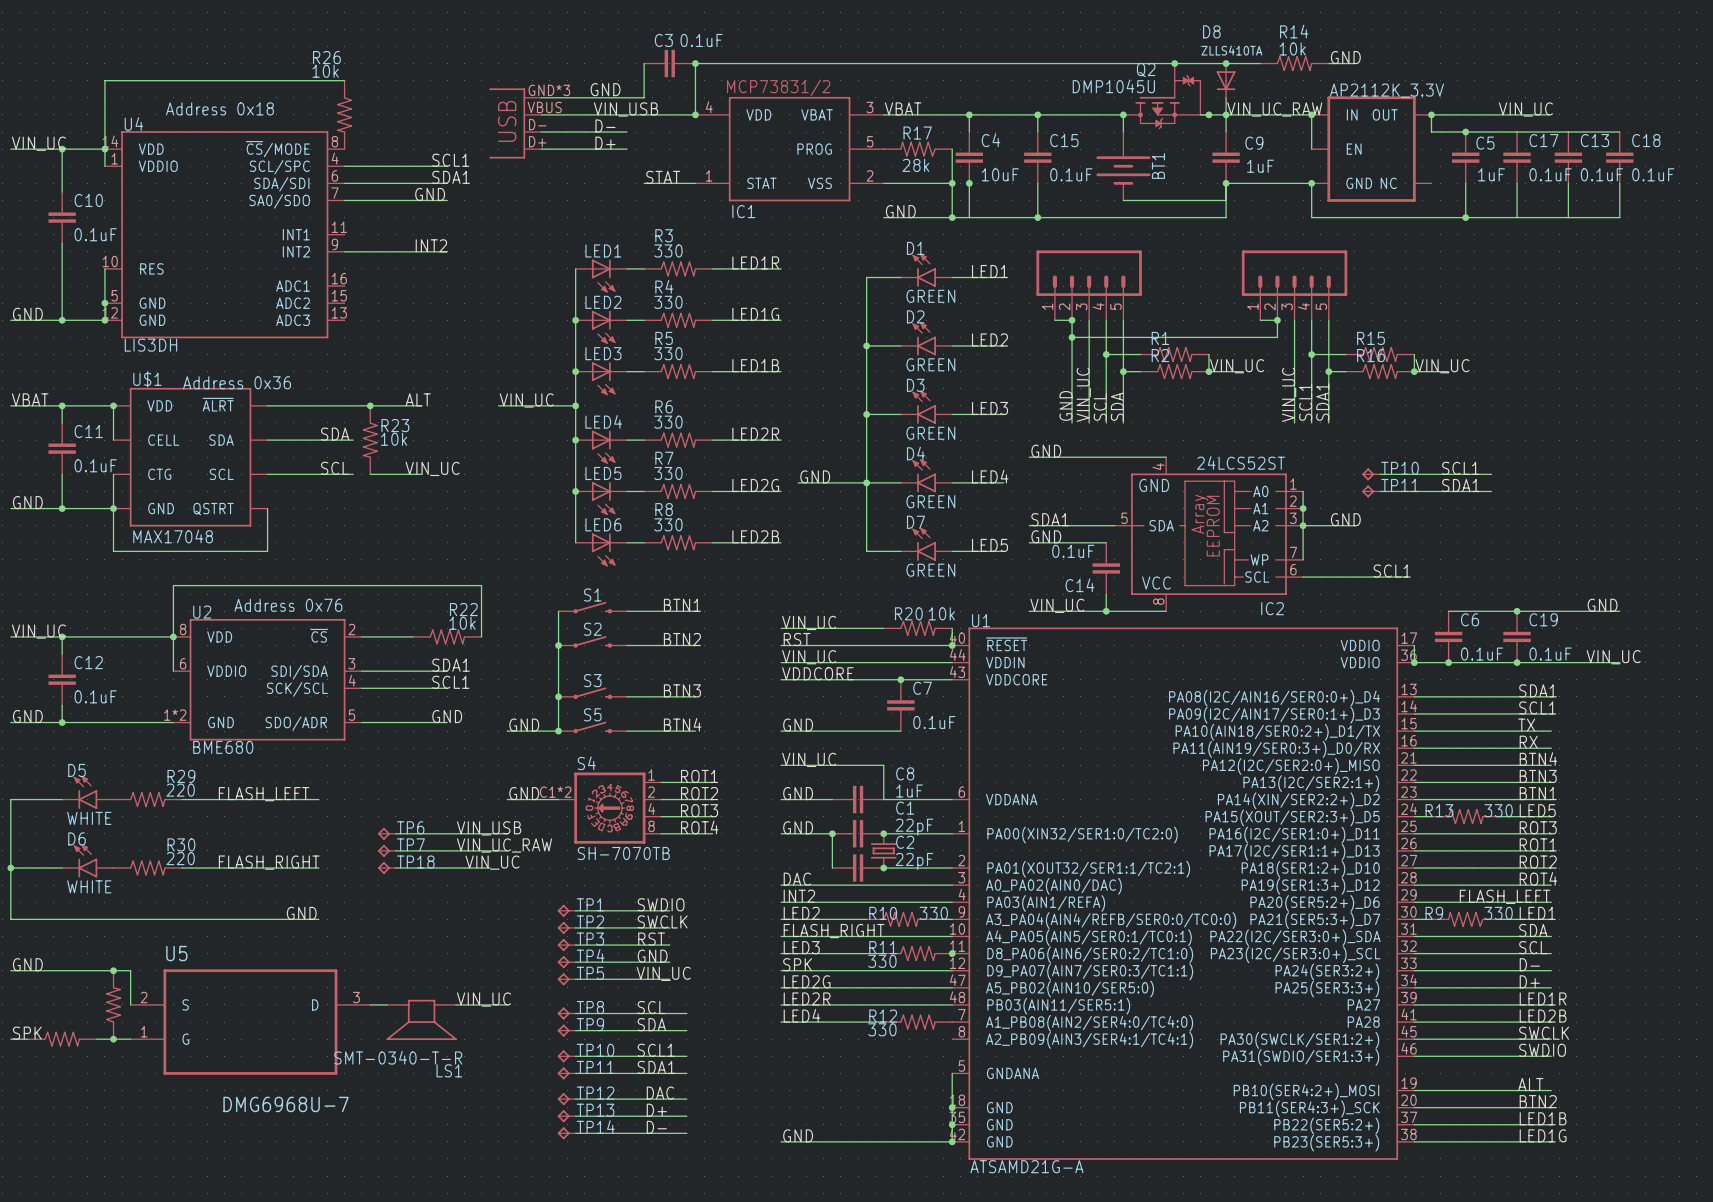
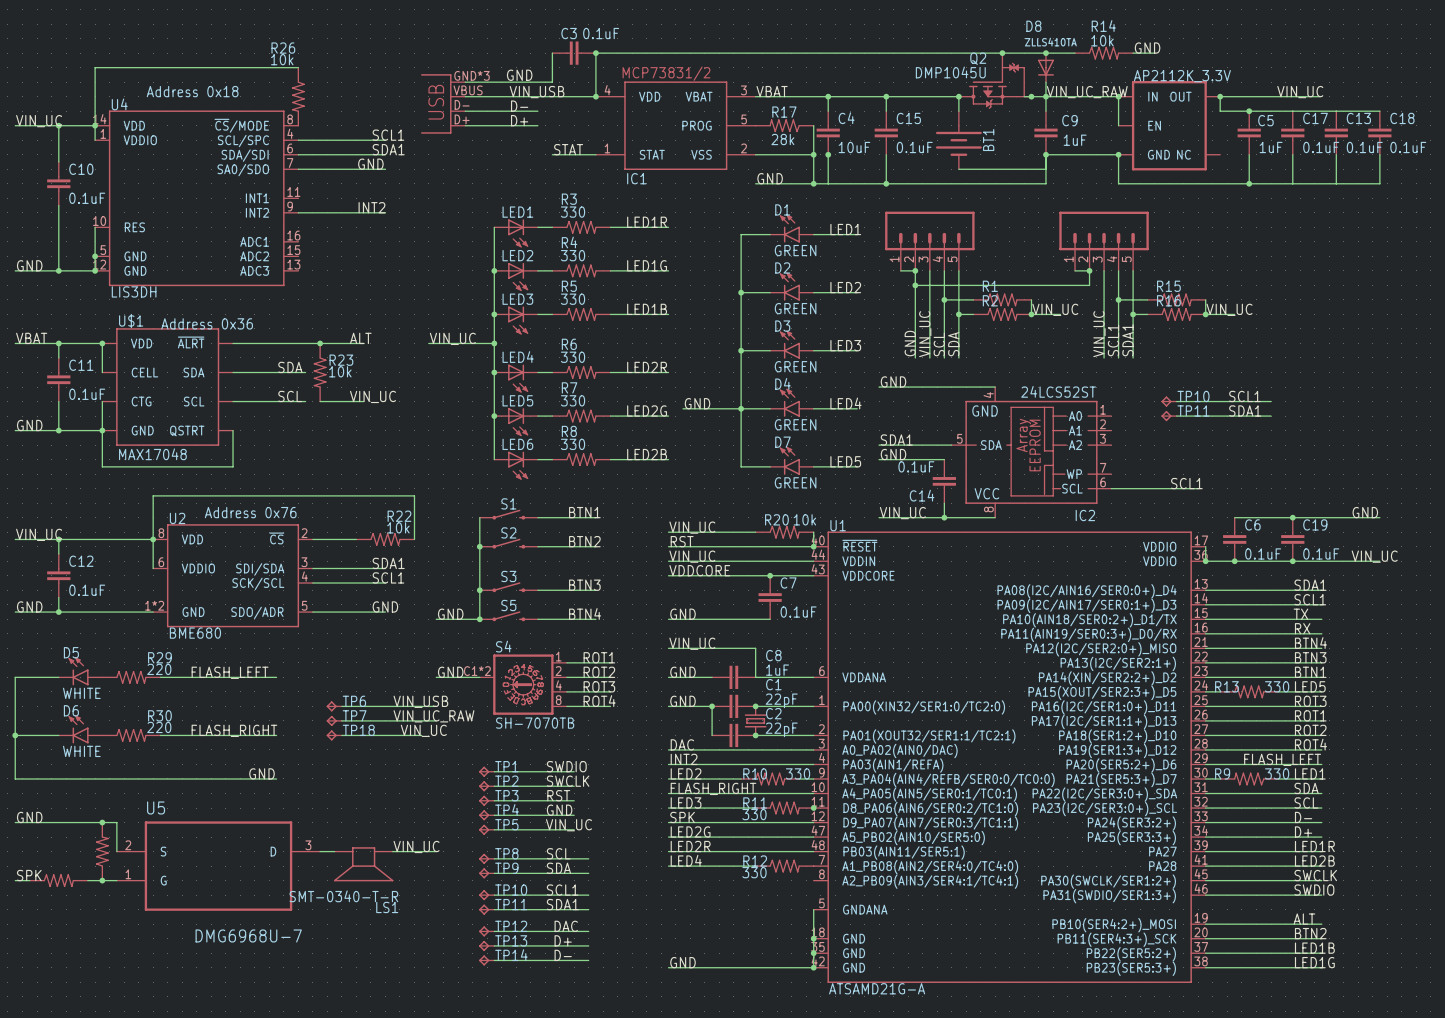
wire: (1303, 491) (1303, 559) -> none
junction: (1303, 508) -> none
label: GND (1345, 519) -> none
wire: (1303, 525) (1354, 525) -> none
junction: (1303, 525) -> none

